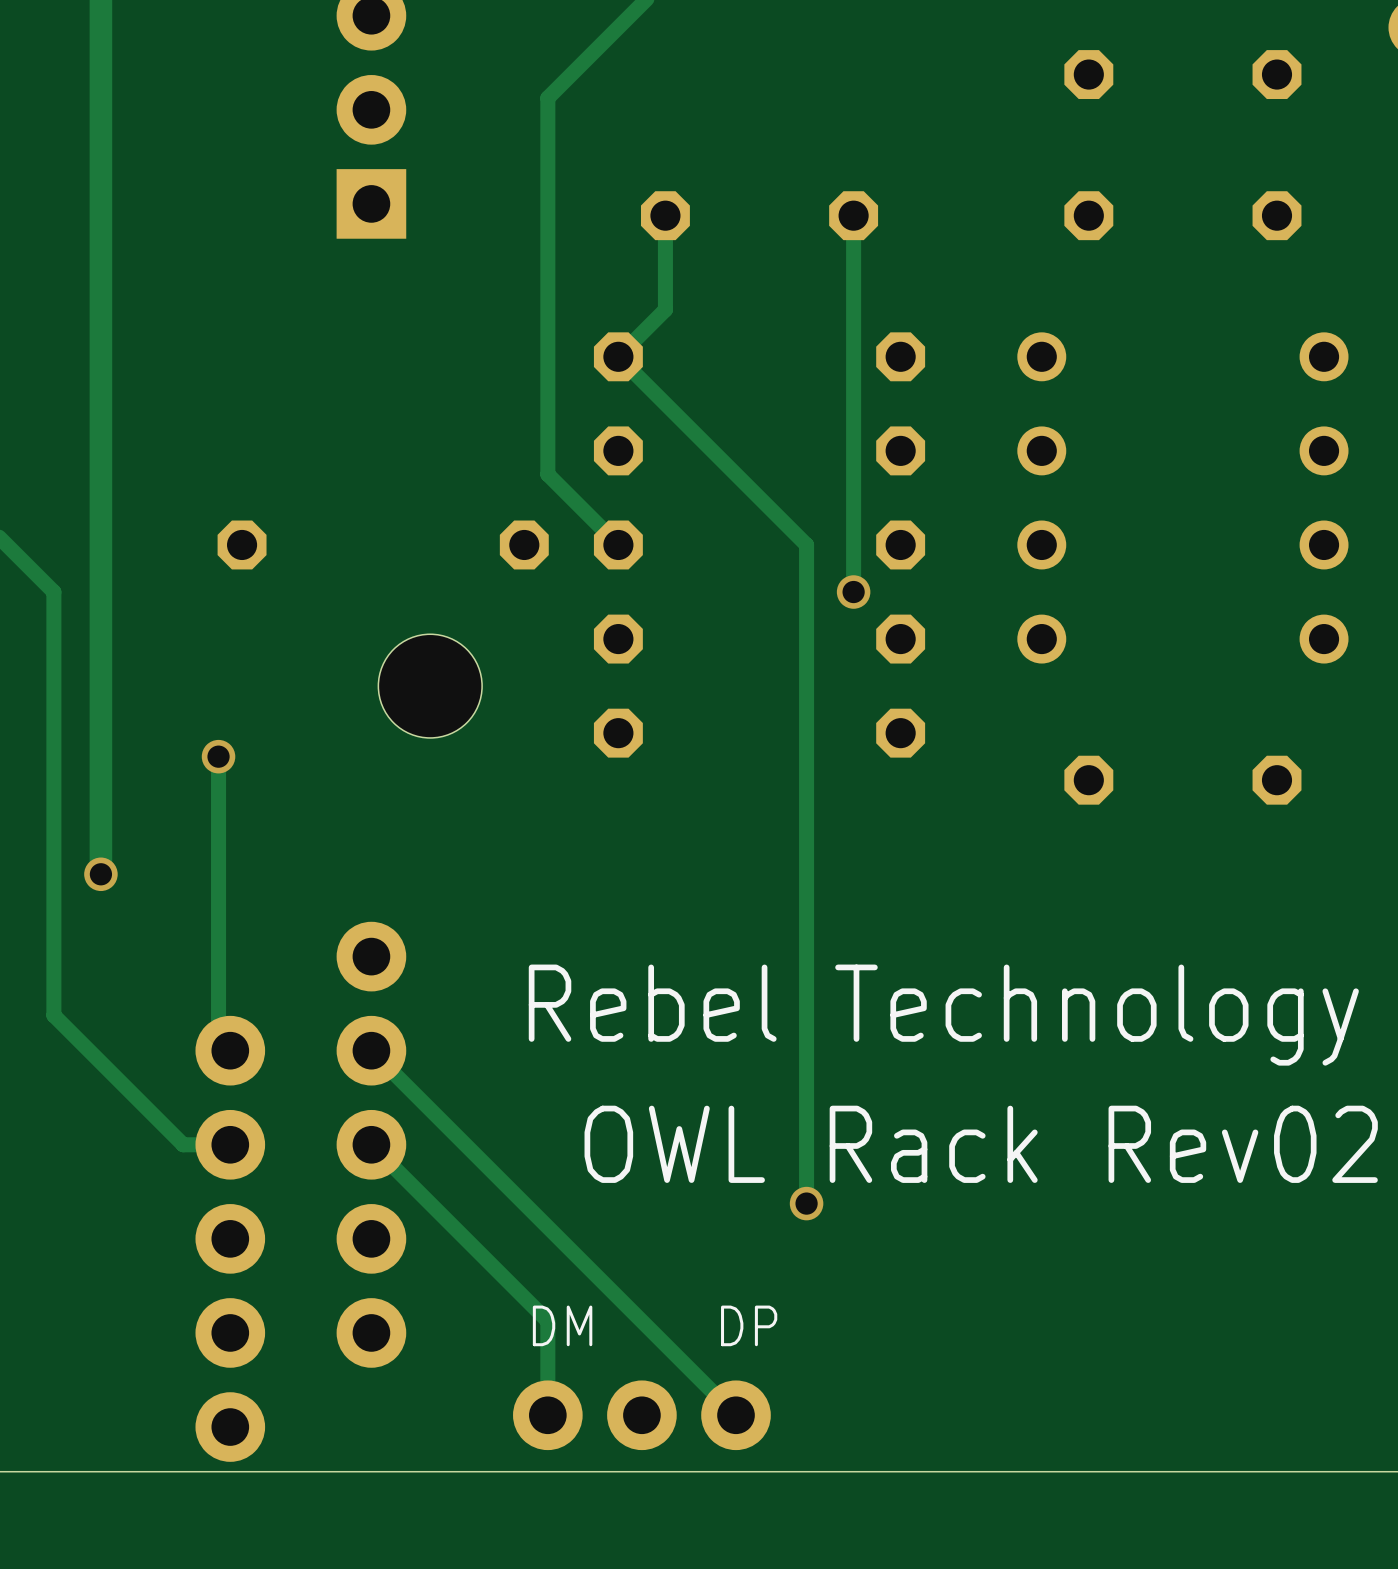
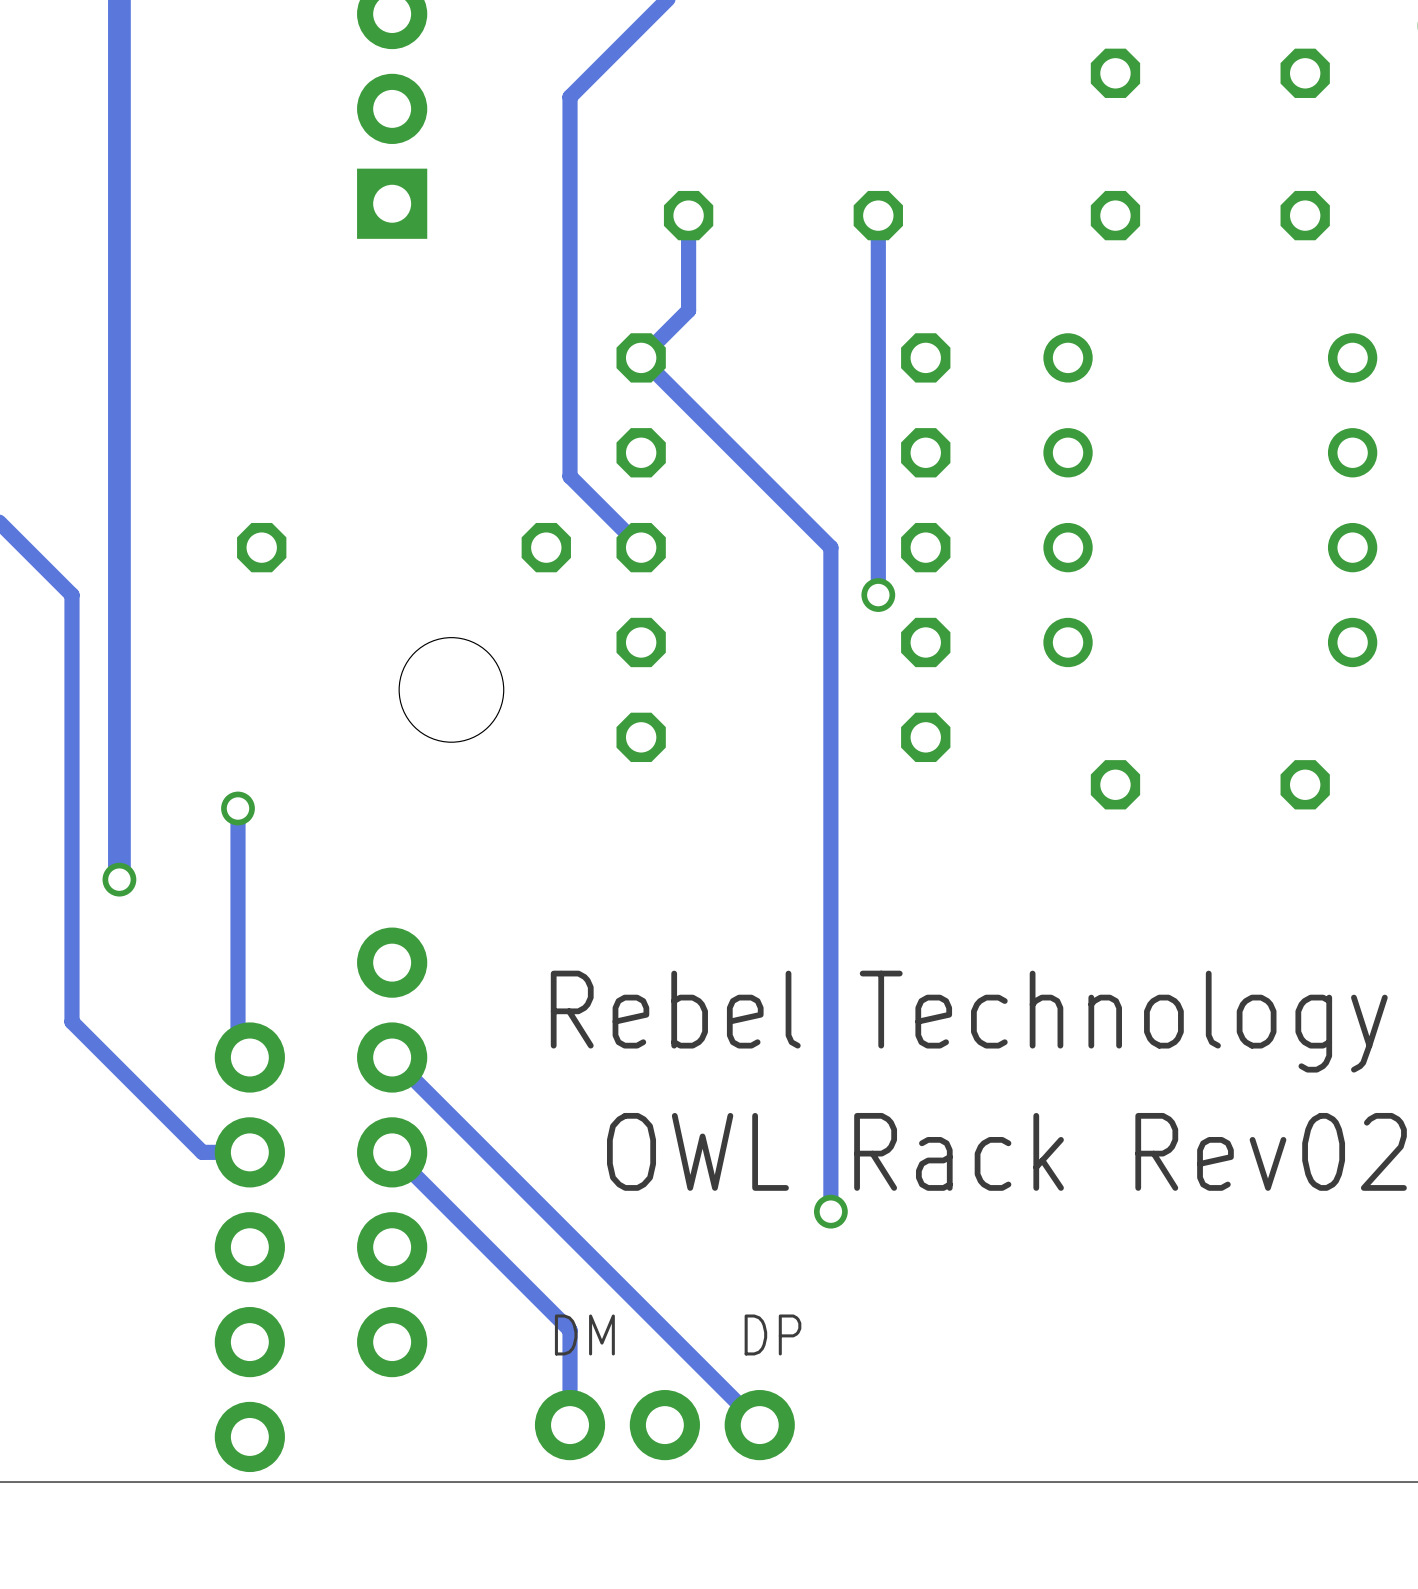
track: (218, 756) (218, 803) -> none
via position: (218, 756) -> (238, 808)

